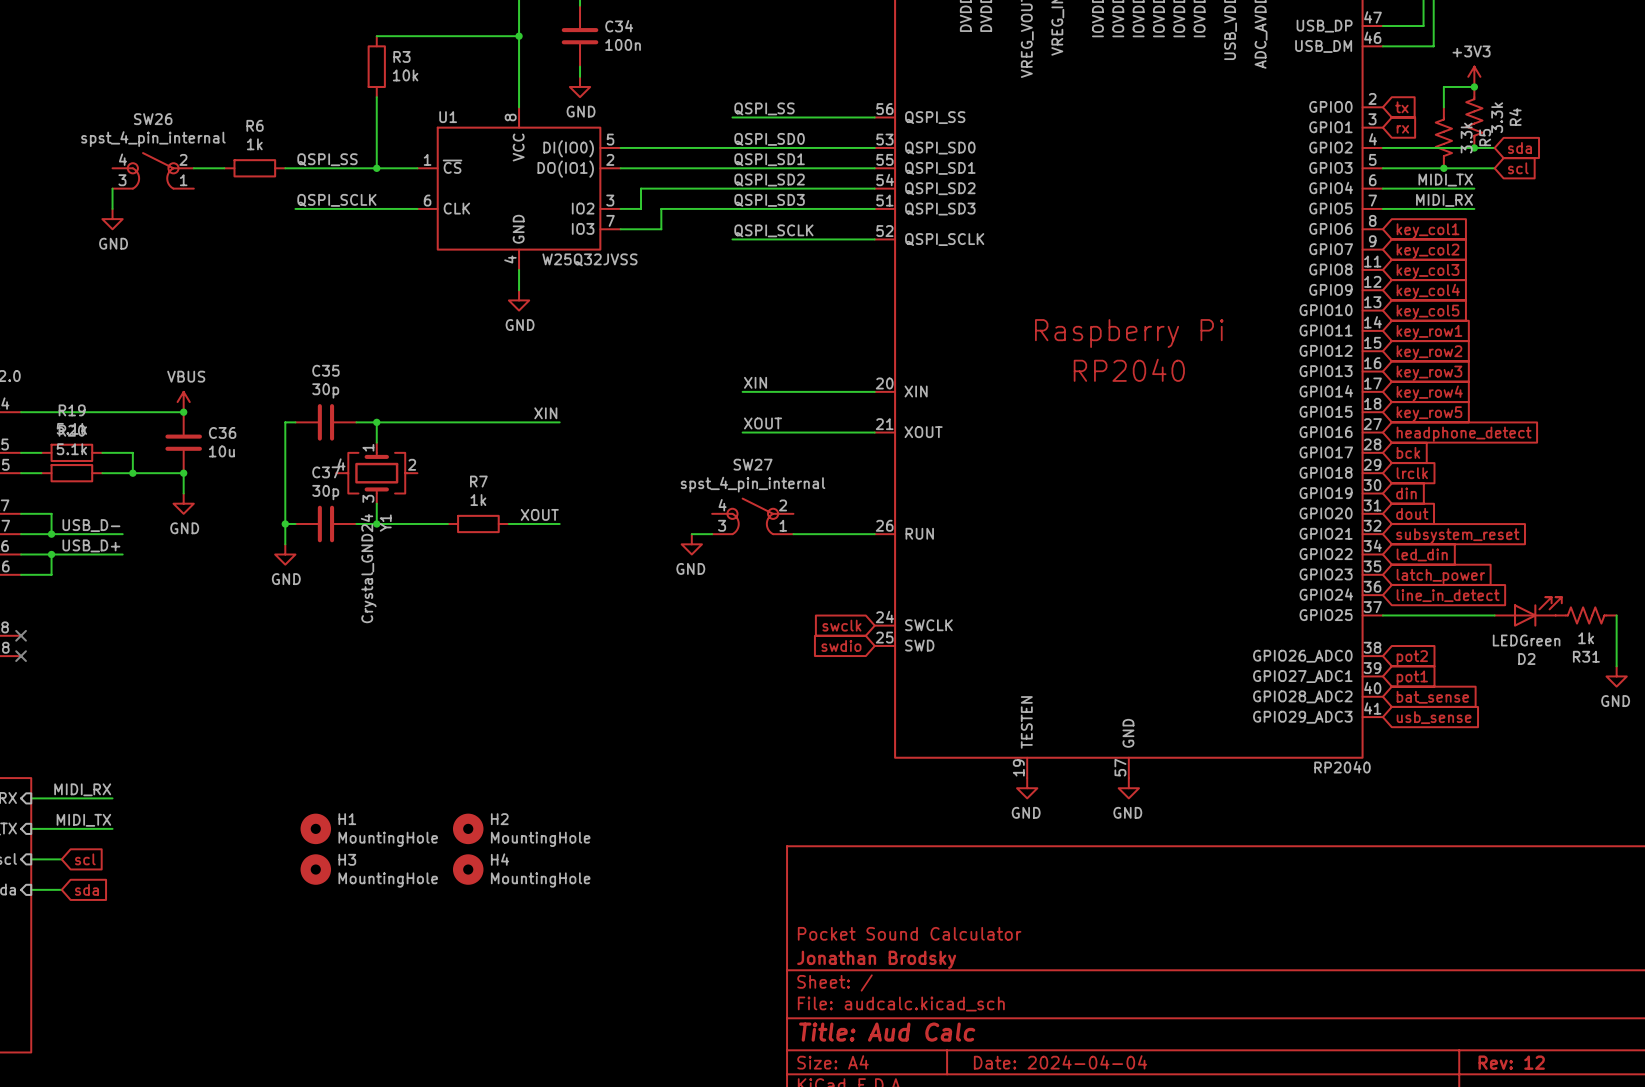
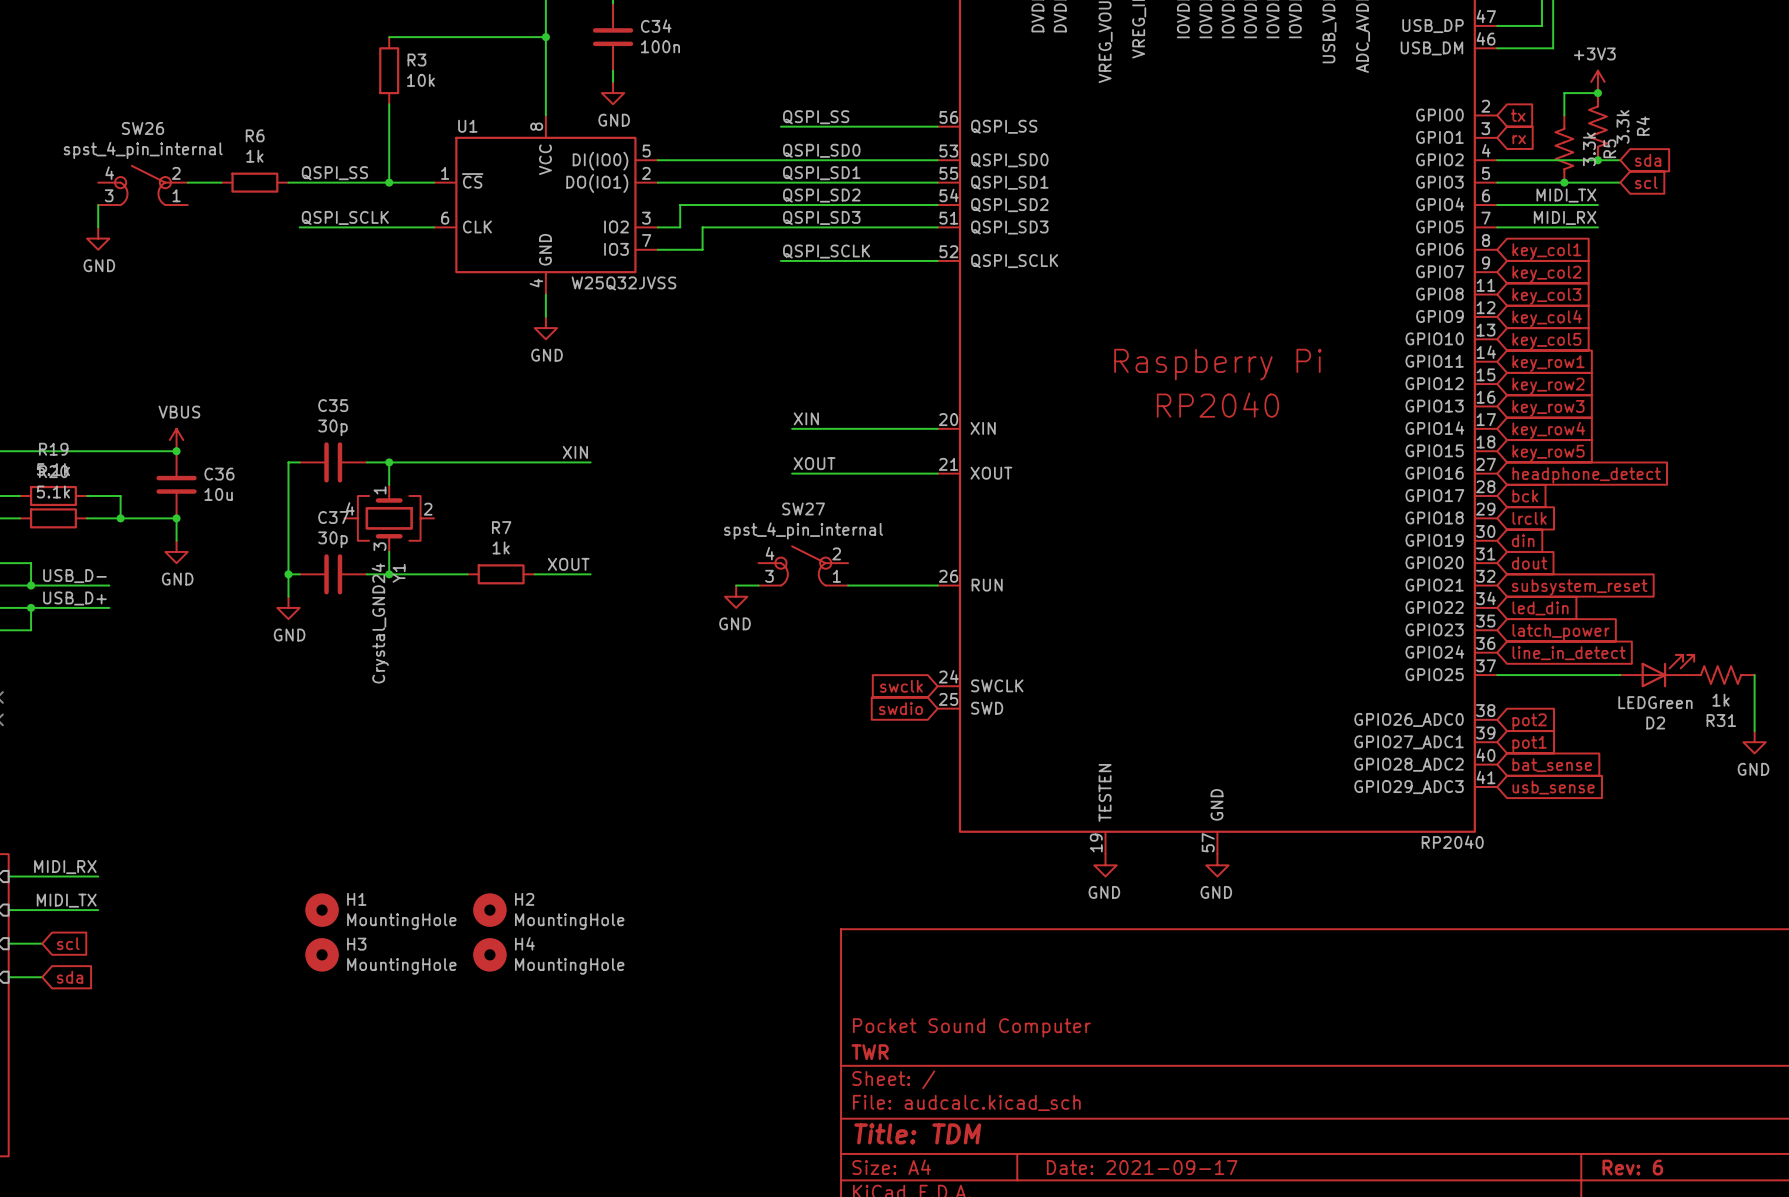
title block: Pocket Sound Calculator (909, 933) -> Pocket Sound Computer (971, 1027)
title block: Jonathan Brodsky (876, 959) -> TWR (870, 1052)
title block: Title: Aud Calc (887, 1032) -> Title: TDM (917, 1133)
title block: Date: 2024-04-04 (1060, 1062) -> Date: 2021-09-17 (1142, 1167)
title block: Rev: 12 (1511, 1062) -> Rev: 6 (1632, 1167)

